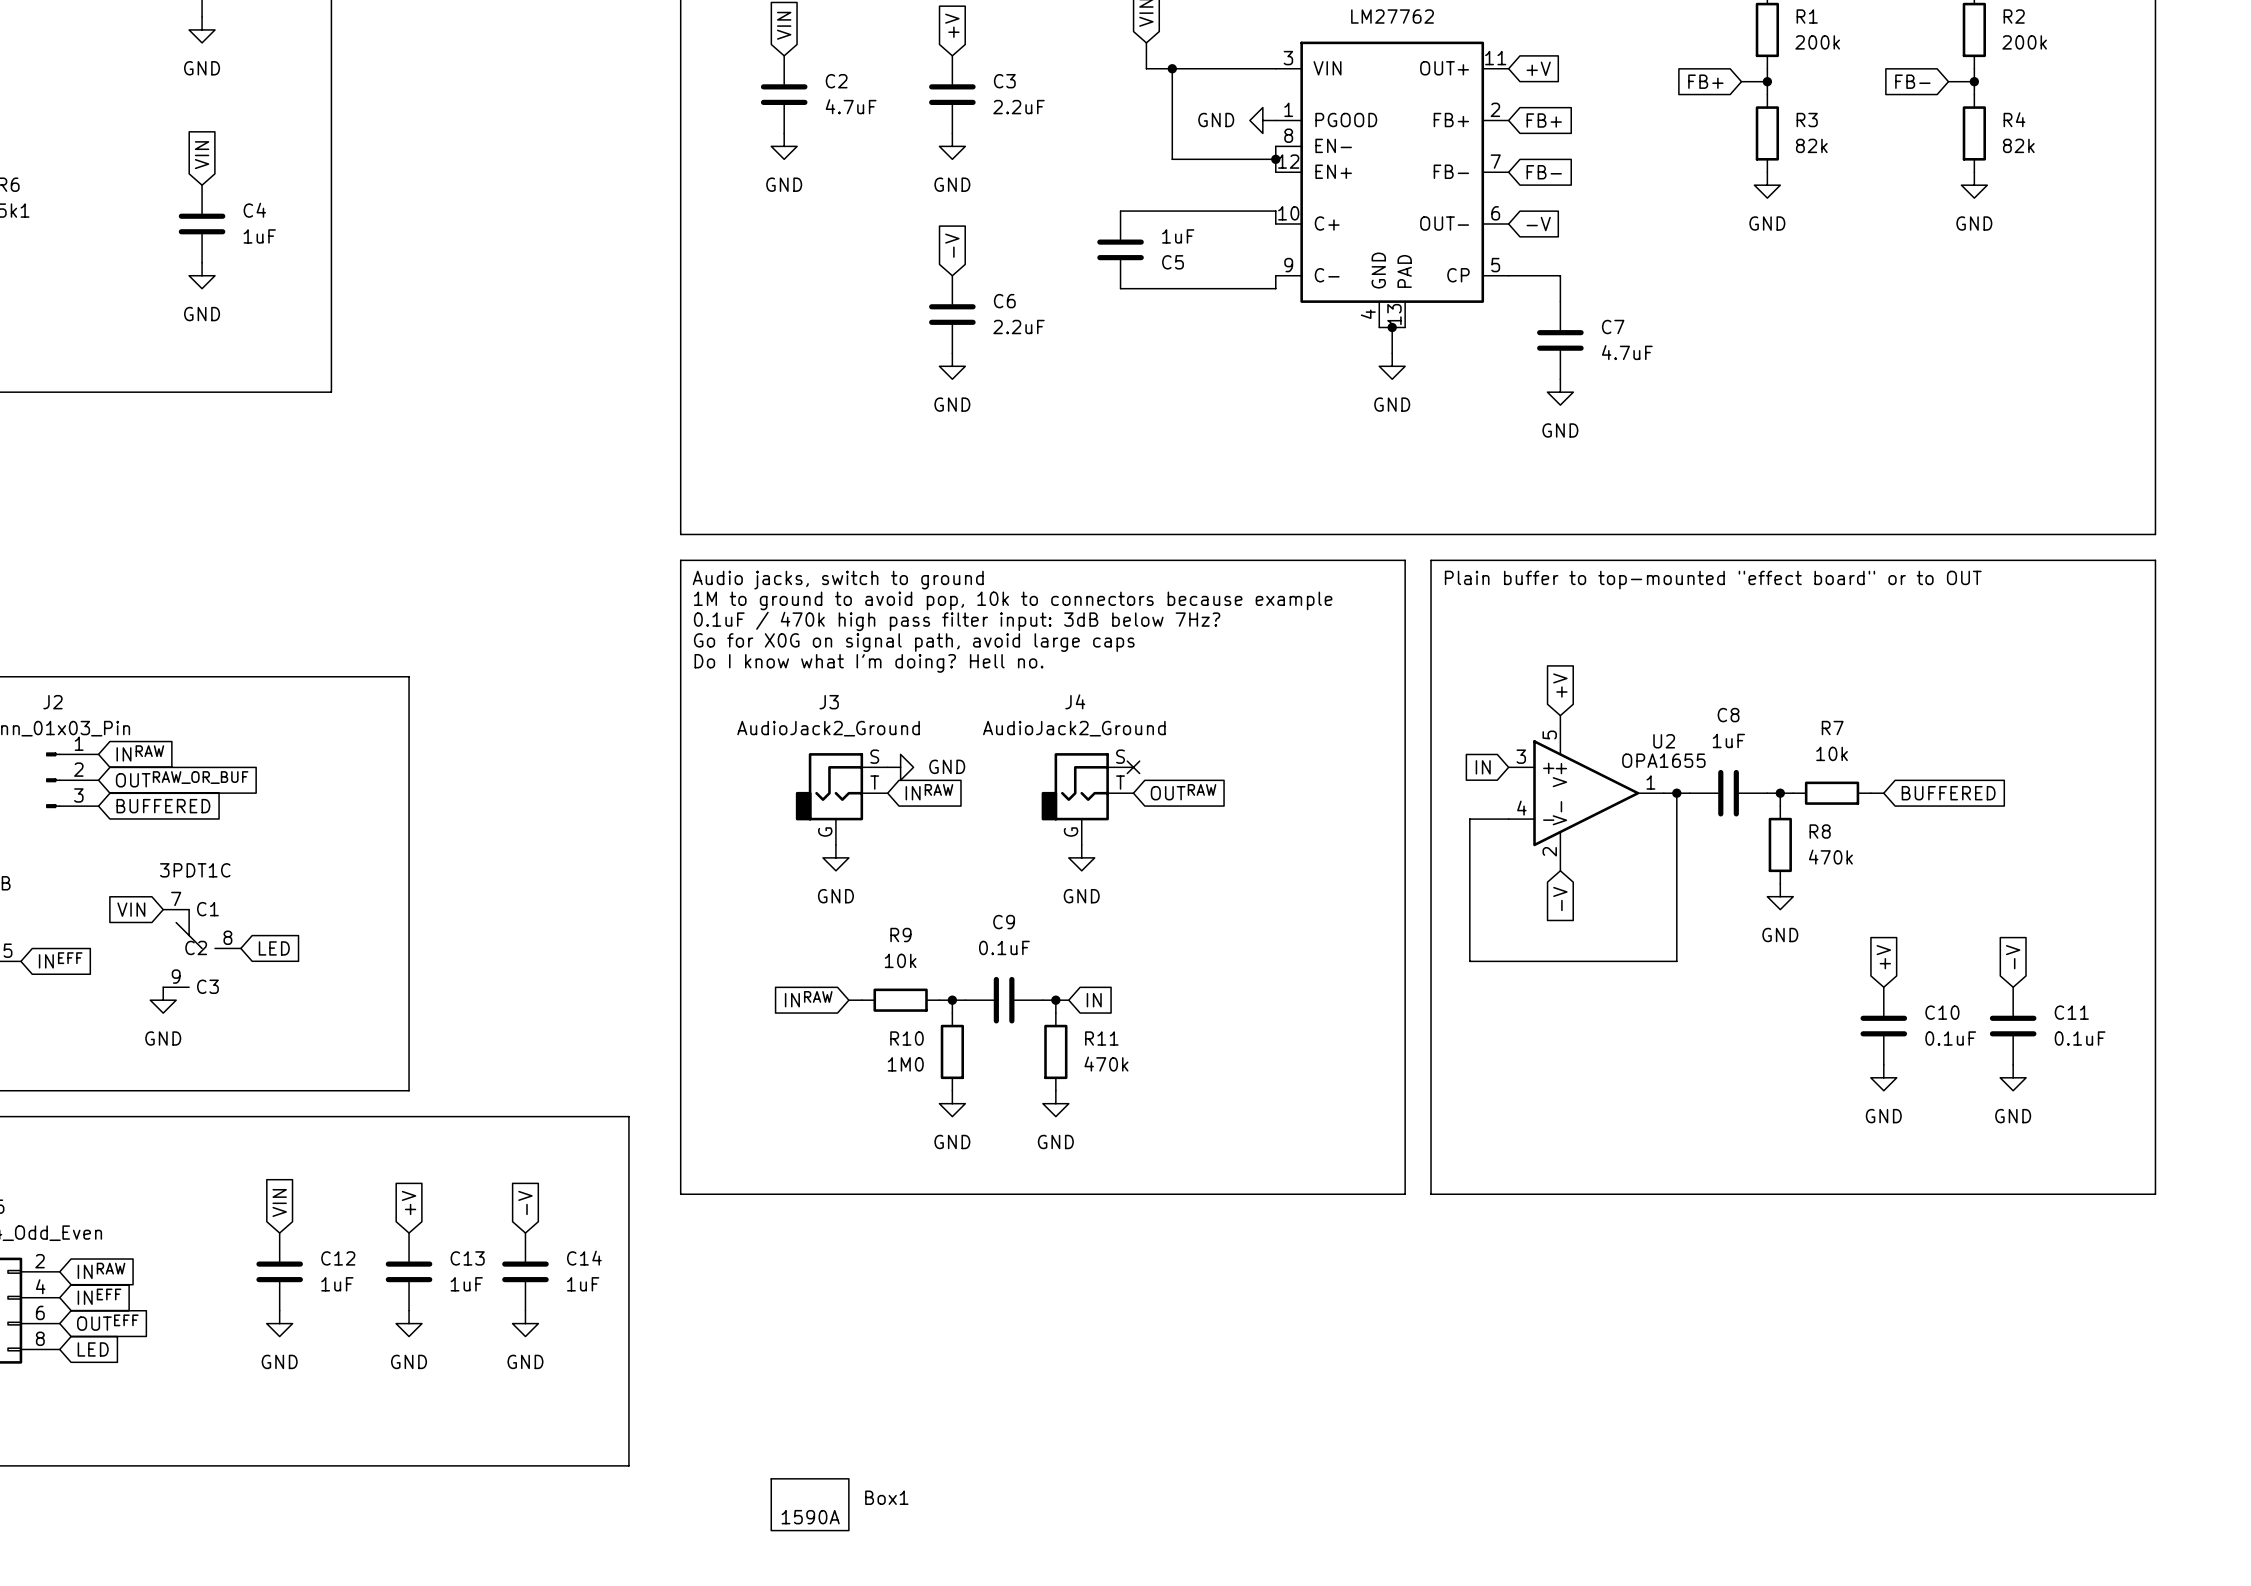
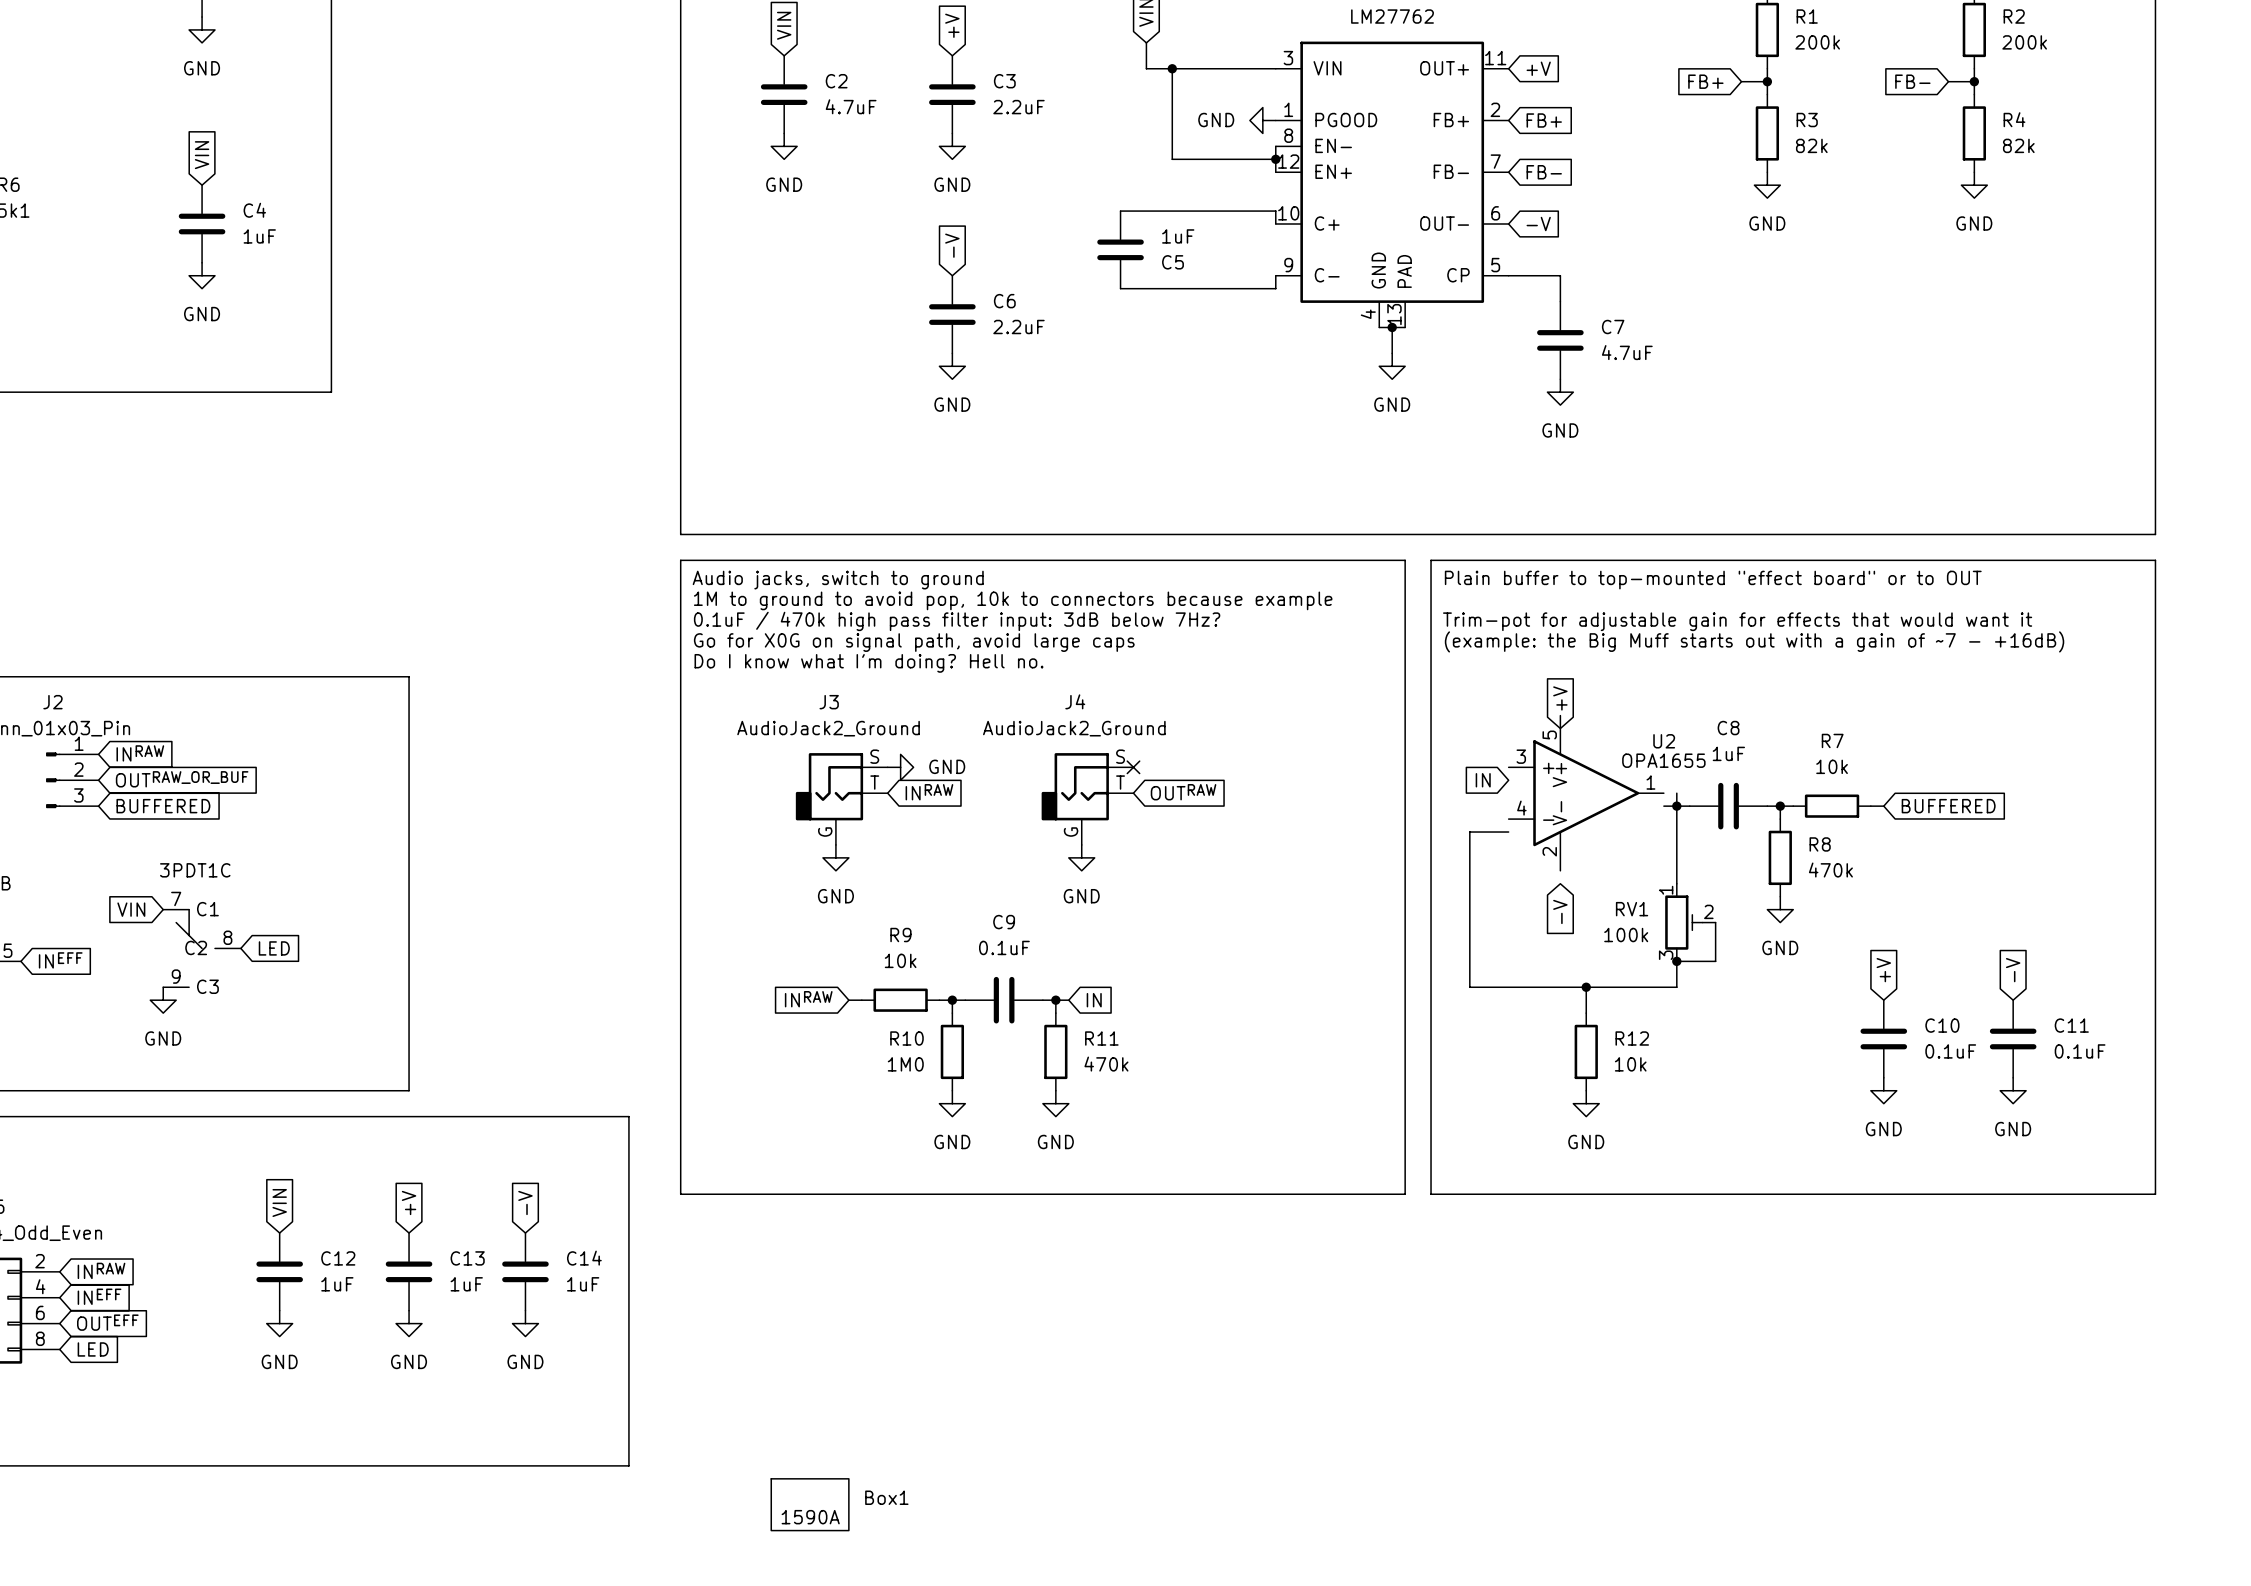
text: none -> Trim-pot for adjustable gain for effects that would want it (1737, 621)
text: none -> (example: the Big Muff starts out with a gain of ~7 - +16dB) (1754, 641)
global label position: +V (1560, 685) -> +V (1560, 698)
global label position: IN (1483, 767) -> IN (1483, 780)
wire: (1663, 793) (1689, 793) -> (1663, 806) (1689, 806)
junction position: (1676, 793) -> (1676, 806)
C8 position: (1728, 793) -> (1728, 806)
wire: (1767, 793) (1793, 793) -> (1767, 806) (1793, 806)
junction position: (1780, 793) -> (1780, 806)
R7 position: (1832, 793) -> (1832, 806)
wire: (1870, 793) (1883, 793) -> (1870, 806) (1883, 806)
global label position: BUFFERED (1948, 793) -> BUFFERED (1948, 806)
wire: (1508, 819) (1469, 819) (1469, 832) -> (1508, 832) (1469, 832)
R8 position: (1780, 844) -> (1780, 857)
wire: (1676, 883) (1676, 961) (1469, 961) -> (1715, 922) (1715, 961) (1676, 961) (1676, 987) (1469, 987) (1469, 961)
power symbol position: GND (1780, 896) -> GND (1780, 909)
global label position: -V (1560, 899) -> -V (1560, 911)
RV1: none -> 100k (1690, 922)
global label position: +V (1883, 957) -> +V (1883, 970)
global label position: -V (2013, 957) -> -V (2013, 970)
junction: none -> (1676, 961)
wire: none -> (1586, 987) (1586, 1013)
junction: none -> (1586, 987)
C10 position: (1883, 1026) -> (1883, 1038)
C11 position: (2013, 1026) -> (2013, 1038)
R12: none -> 10k (1586, 1051)
power symbol position: GND (1883, 1077) -> GND (1883, 1090)
power symbol position: GND (2013, 1077) -> GND (2013, 1090)
power symbol: none -> GND (1586, 1103)

